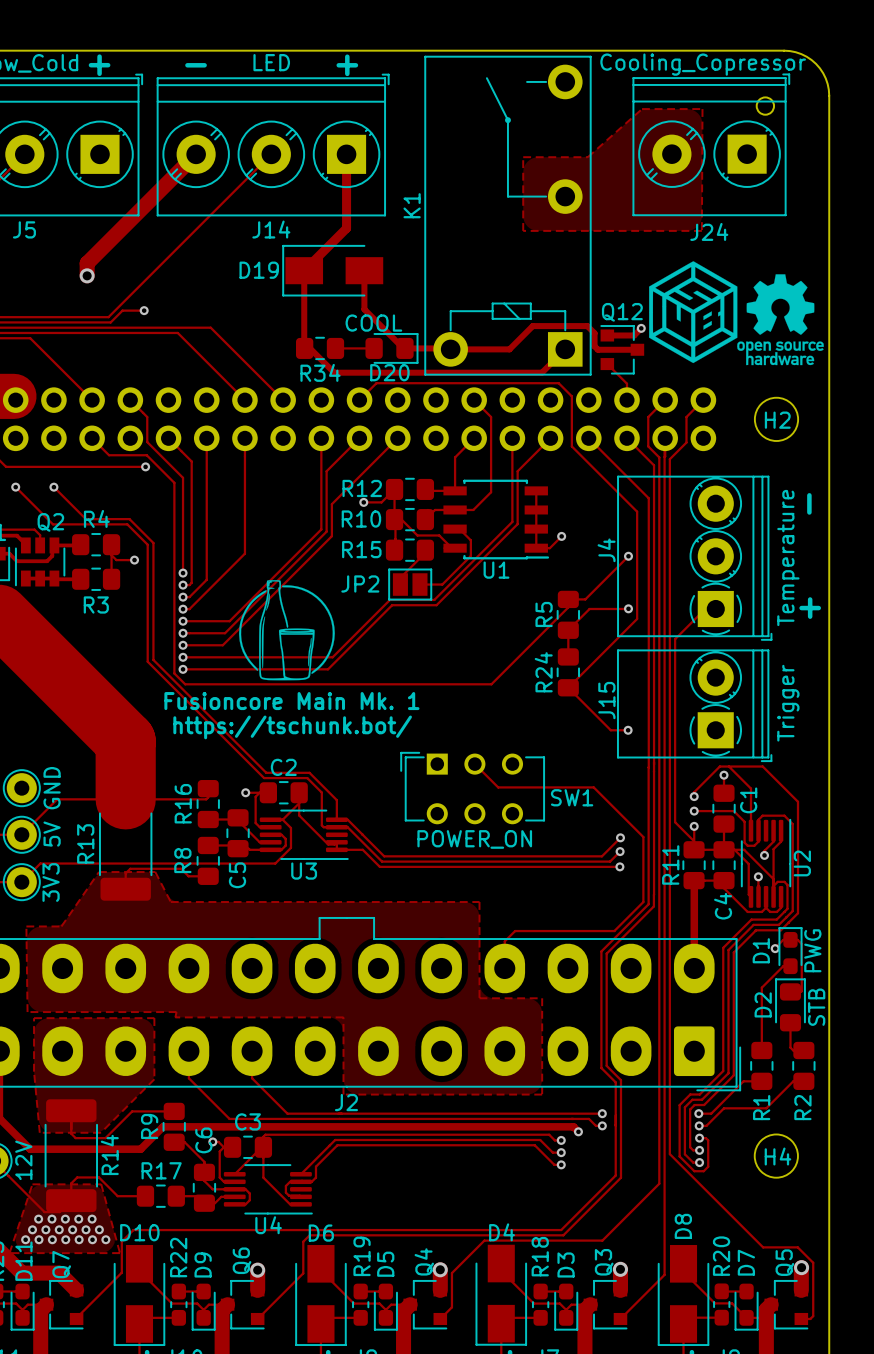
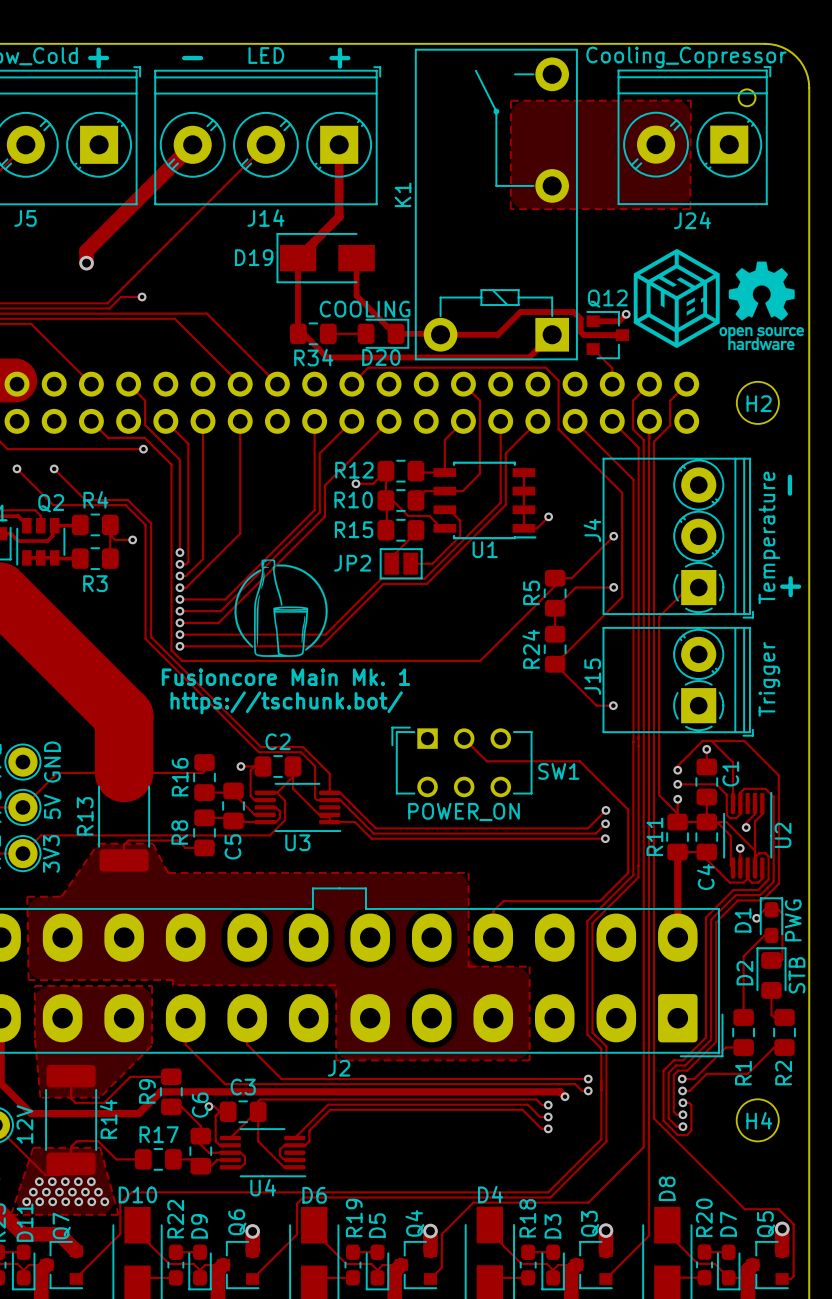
zone outline: (642, 109) (587, 157) (523, 157) (523, 230) (701, 230) (702, 109) (642, 109) -> (510, 100) (510, 209) (690, 209) (690, 100) (510, 100)
D20 value: COOL (373, 323) -> COOLING (365, 309)

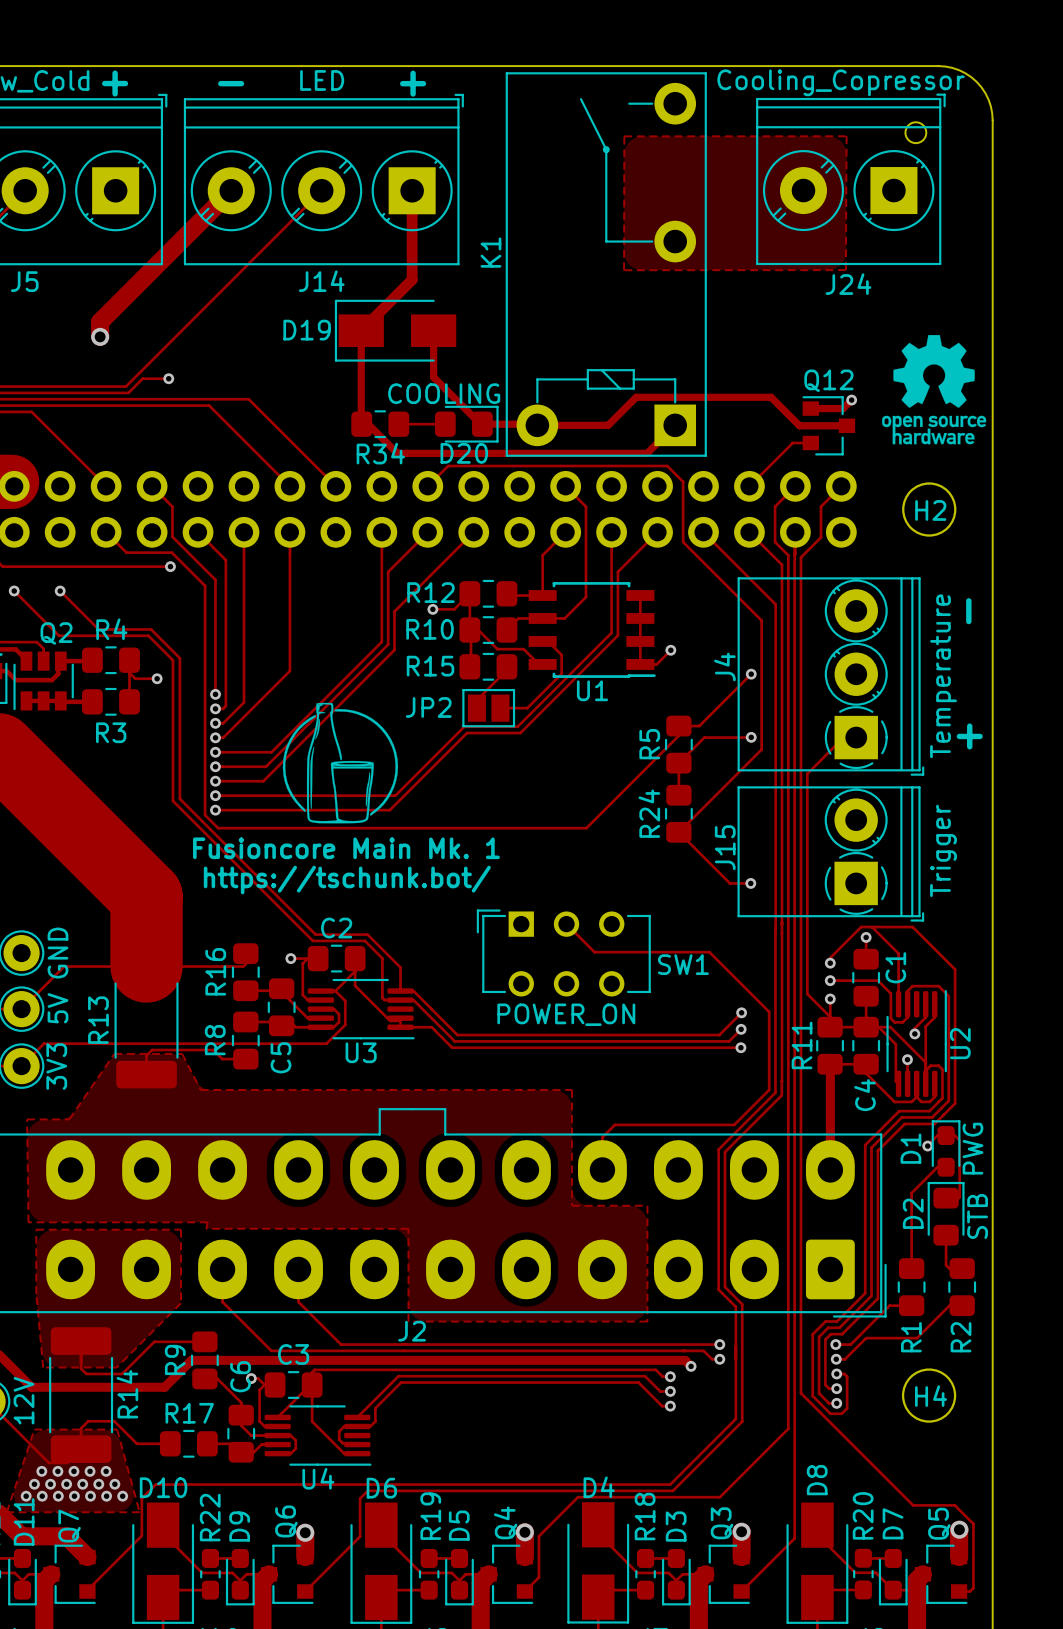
drawing: [633, 248, 720, 349] -> none
track: (573, 312) (580, 319) (580, 331) (584, 335) (622, 335) -> (701, 397) (771, 397) (799, 425) (847, 425)
track: (626, 314) (619, 321) (593, 321) -> (851, 400) (843, 408) (810, 408)
via position: (626, 314) -> (851, 400)
Q12 position: (607, 335) -> (828, 425)
track: (593, 349) (612, 368) (612, 384) -> (810, 442) (792, 442) (749, 486)

